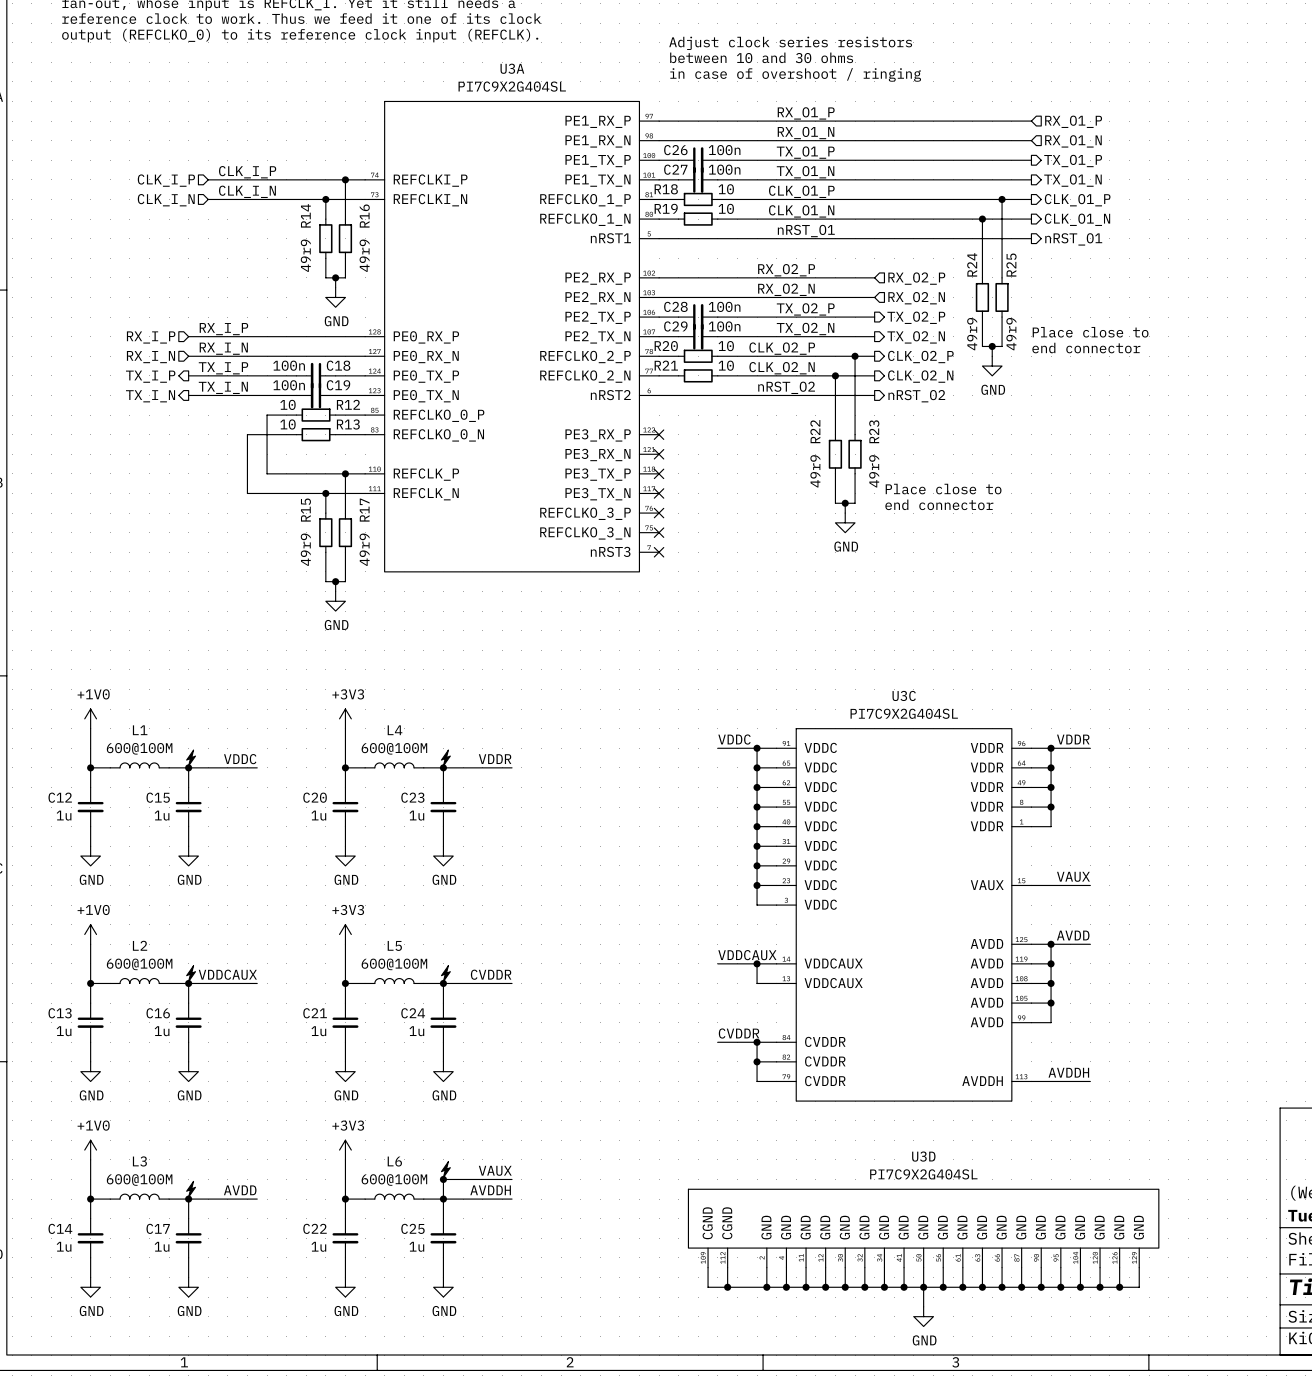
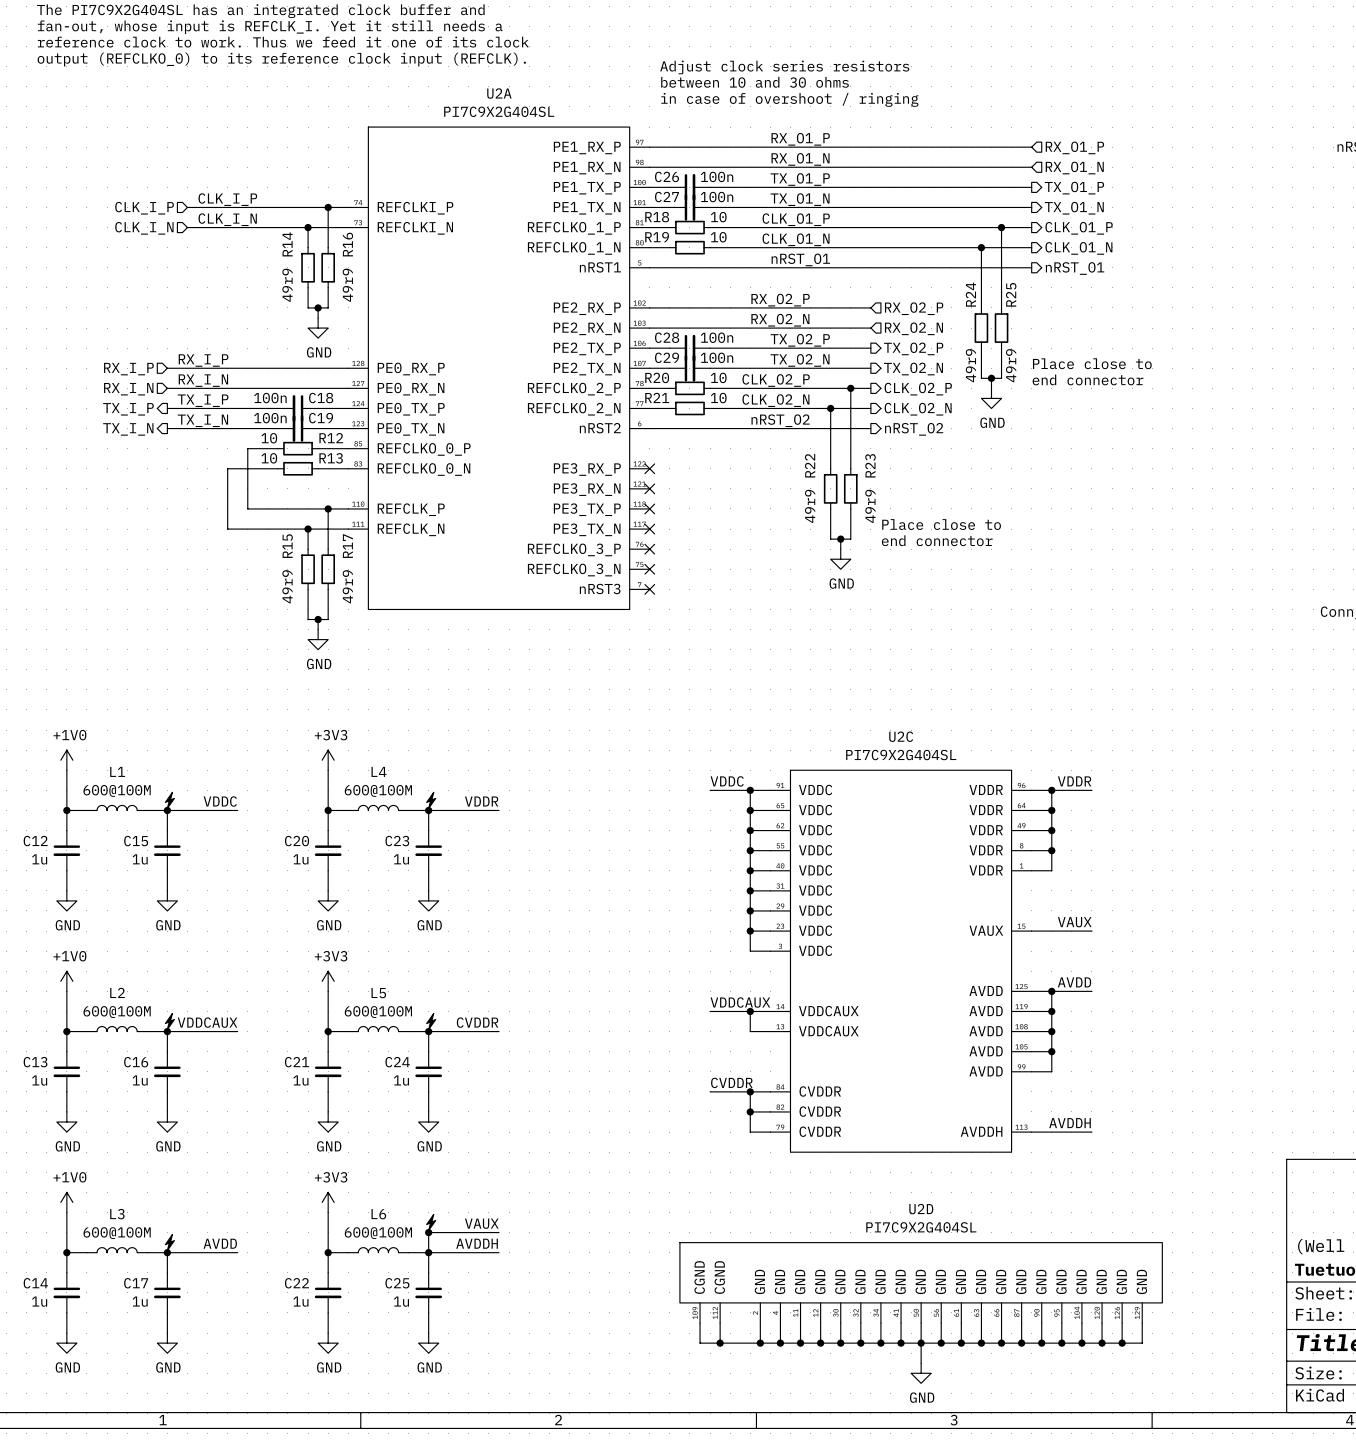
U3A name: U3A (512, 68) -> U2A (499, 93)
U3C name: U3C (904, 695) -> U2C (901, 736)
U3D name: U3D (923, 1156) -> U2D (921, 1209)

